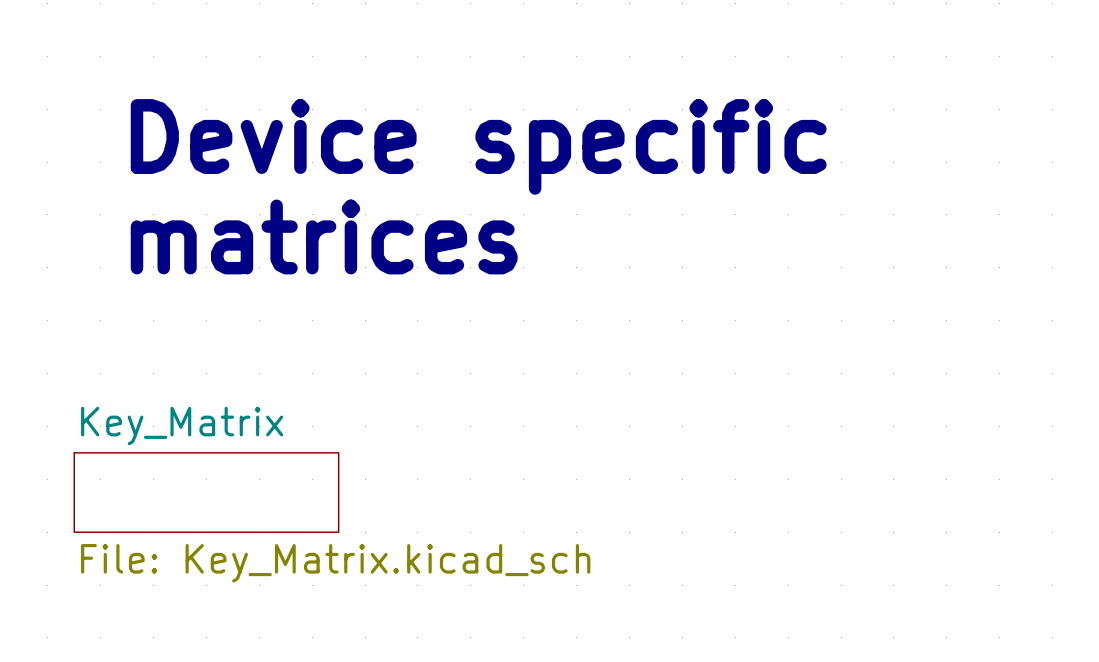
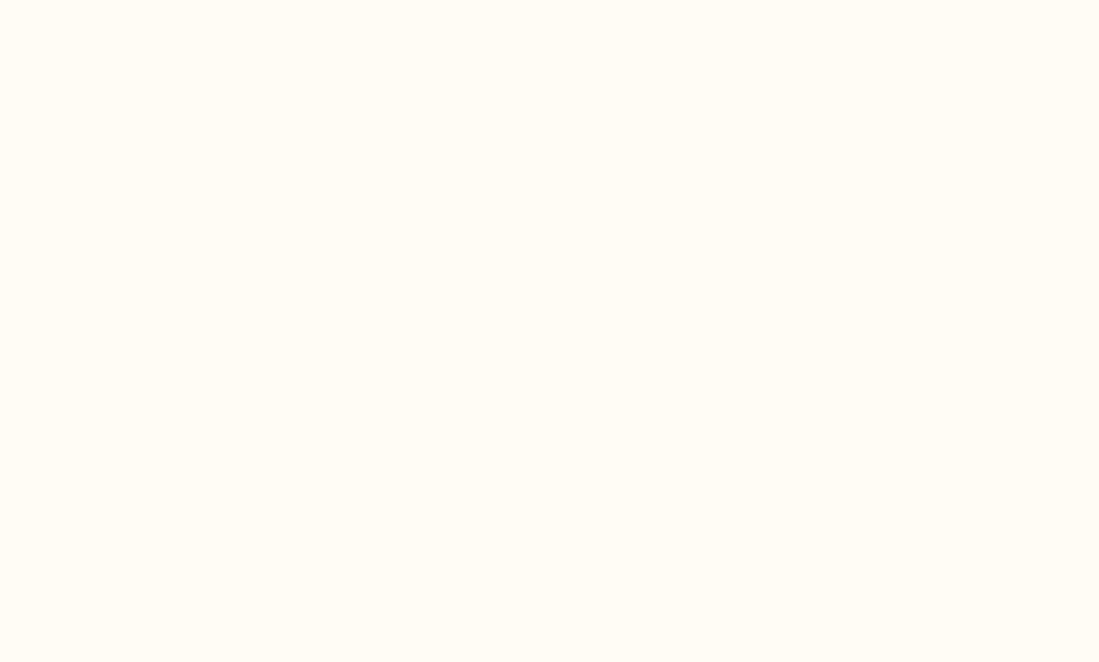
text: Device specific (478, 146) -> none
text: matrices (324, 236) -> none
sheet Key_Matrix: File: Key_Matrix.kicad_sch (206, 492) -> none

